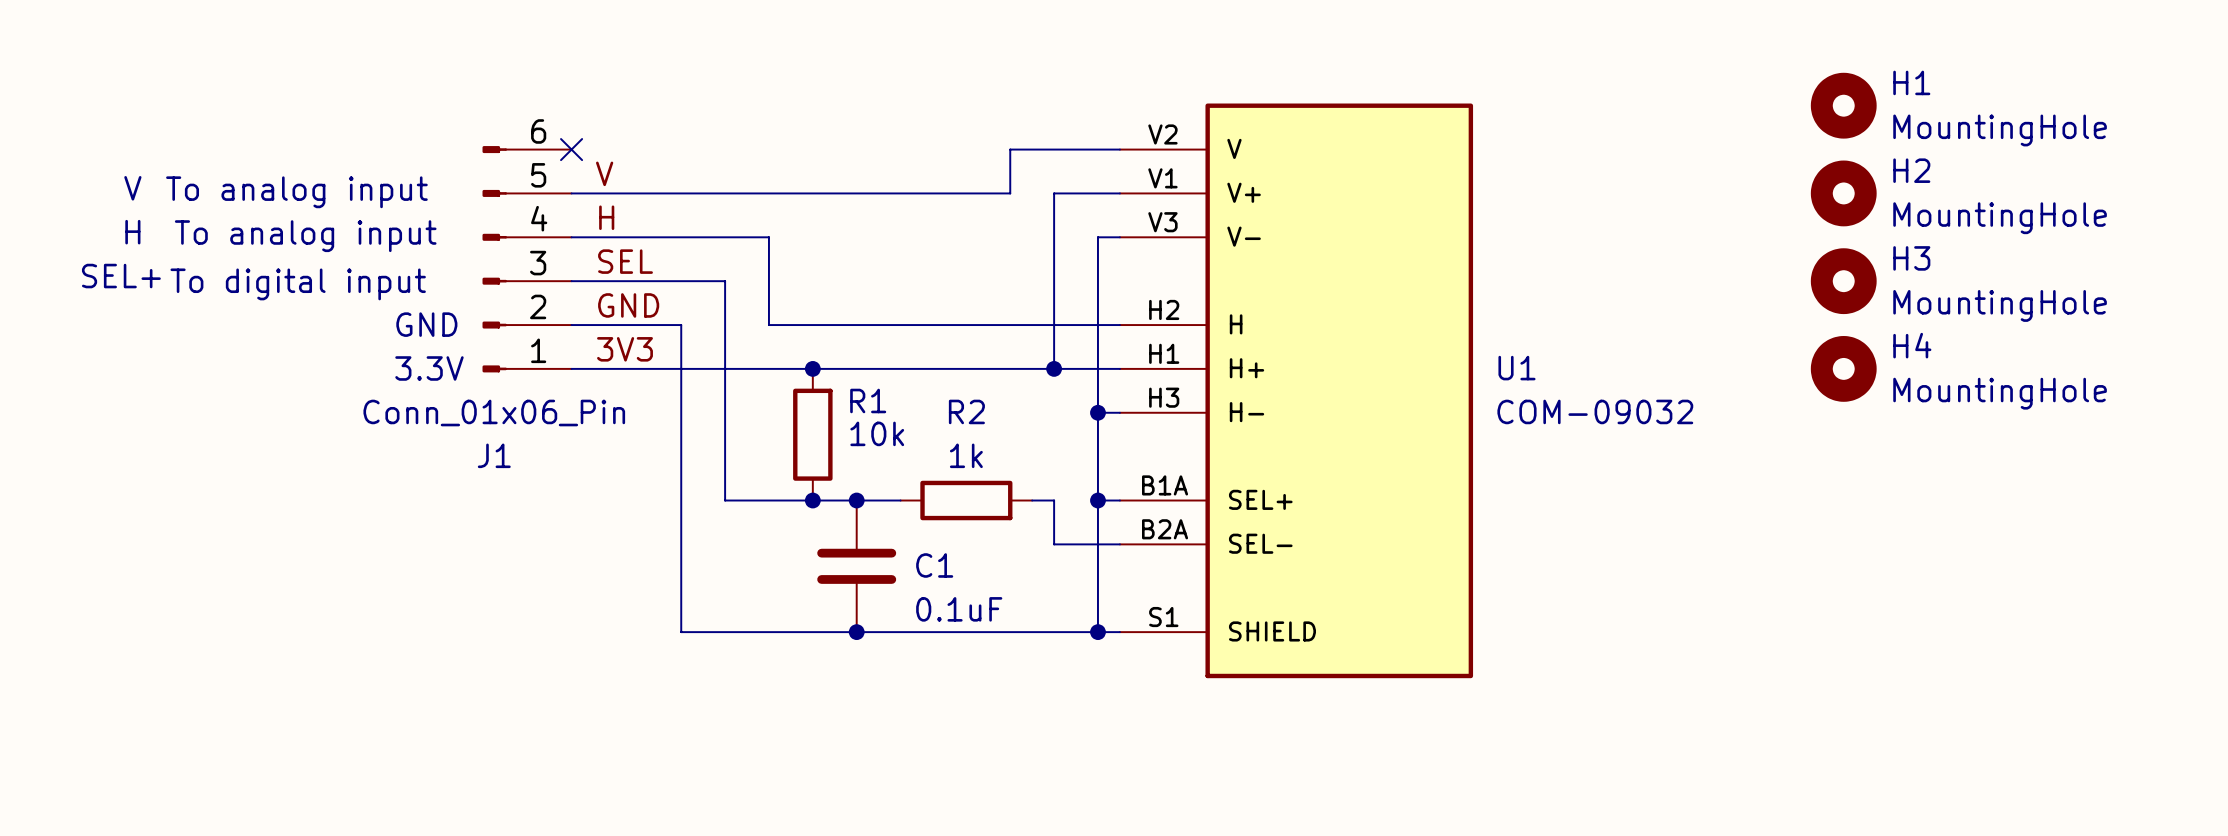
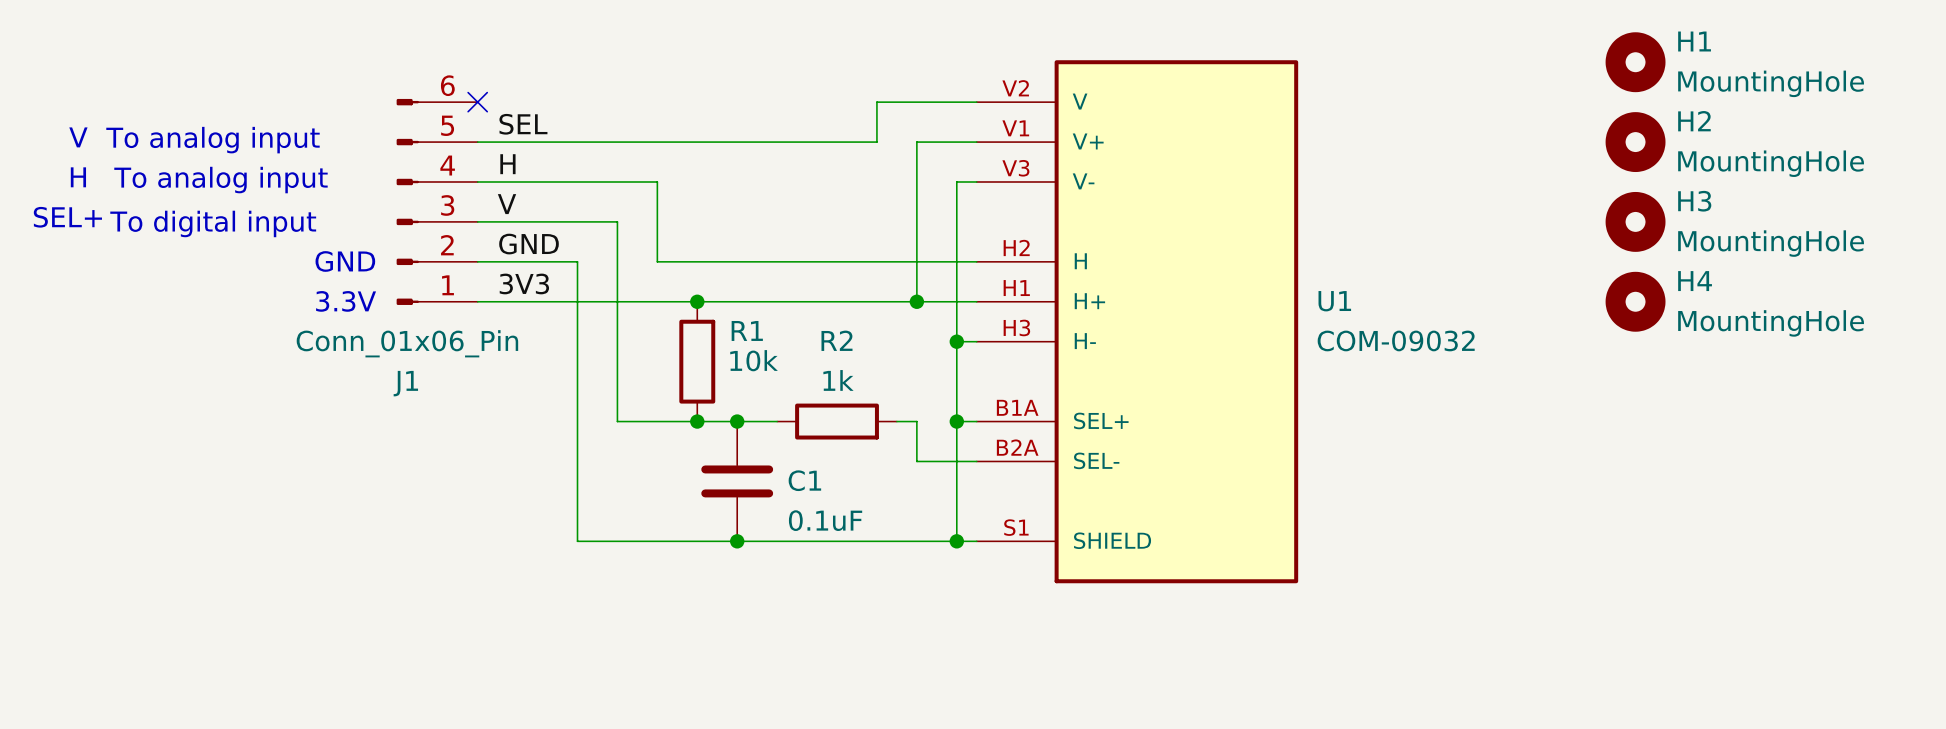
label: V (604, 173) -> SEL (523, 124)
label: SEL (625, 261) -> V (507, 204)

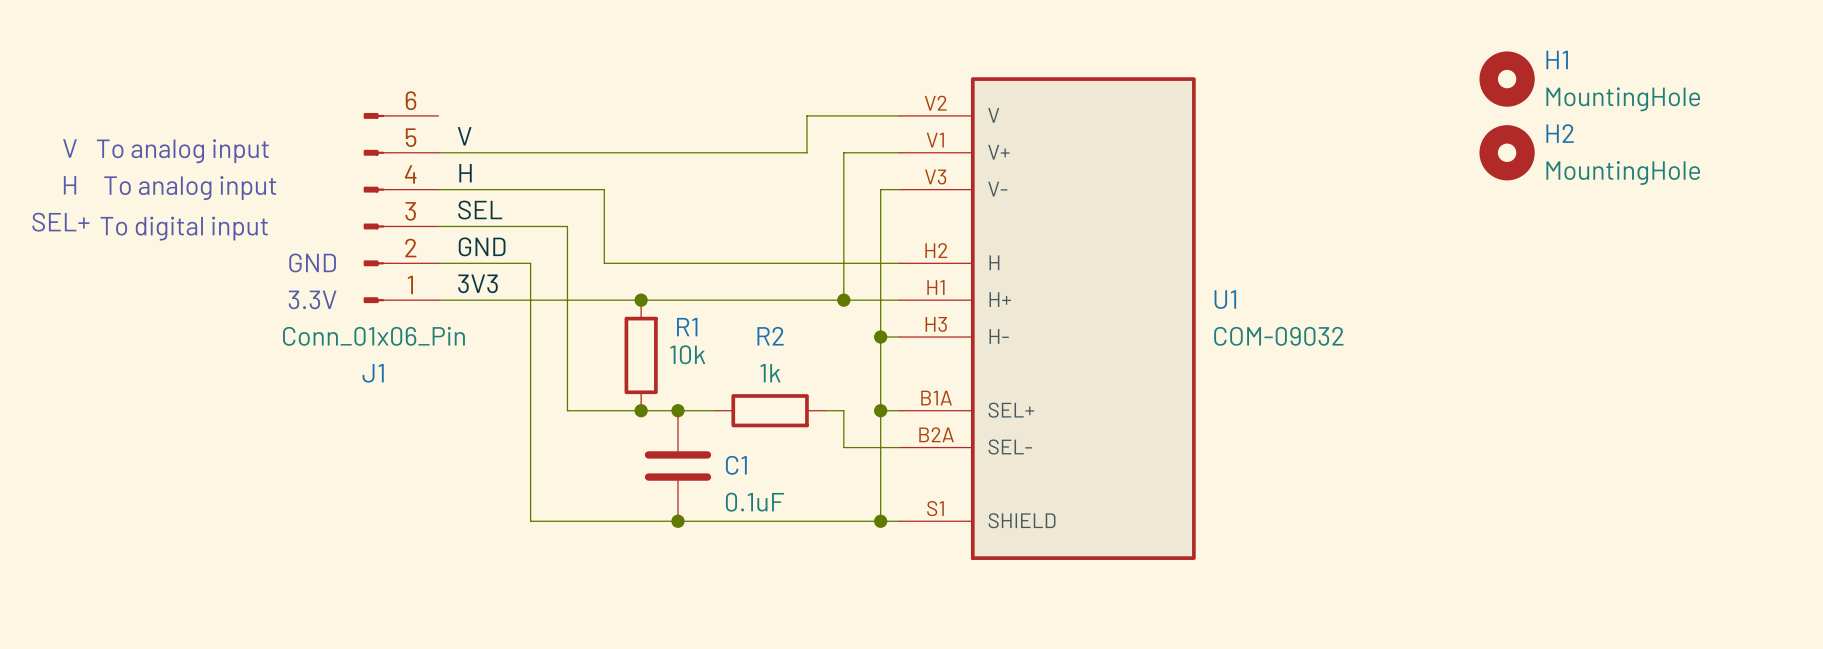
no-connect mark: (477, 102) -> none
label: SEL (523, 124) -> V (464, 136)
label: V (507, 204) -> SEL (480, 210)
H3: MountingHole (1635, 221) -> none
H4: MountingHole (1635, 301) -> none

